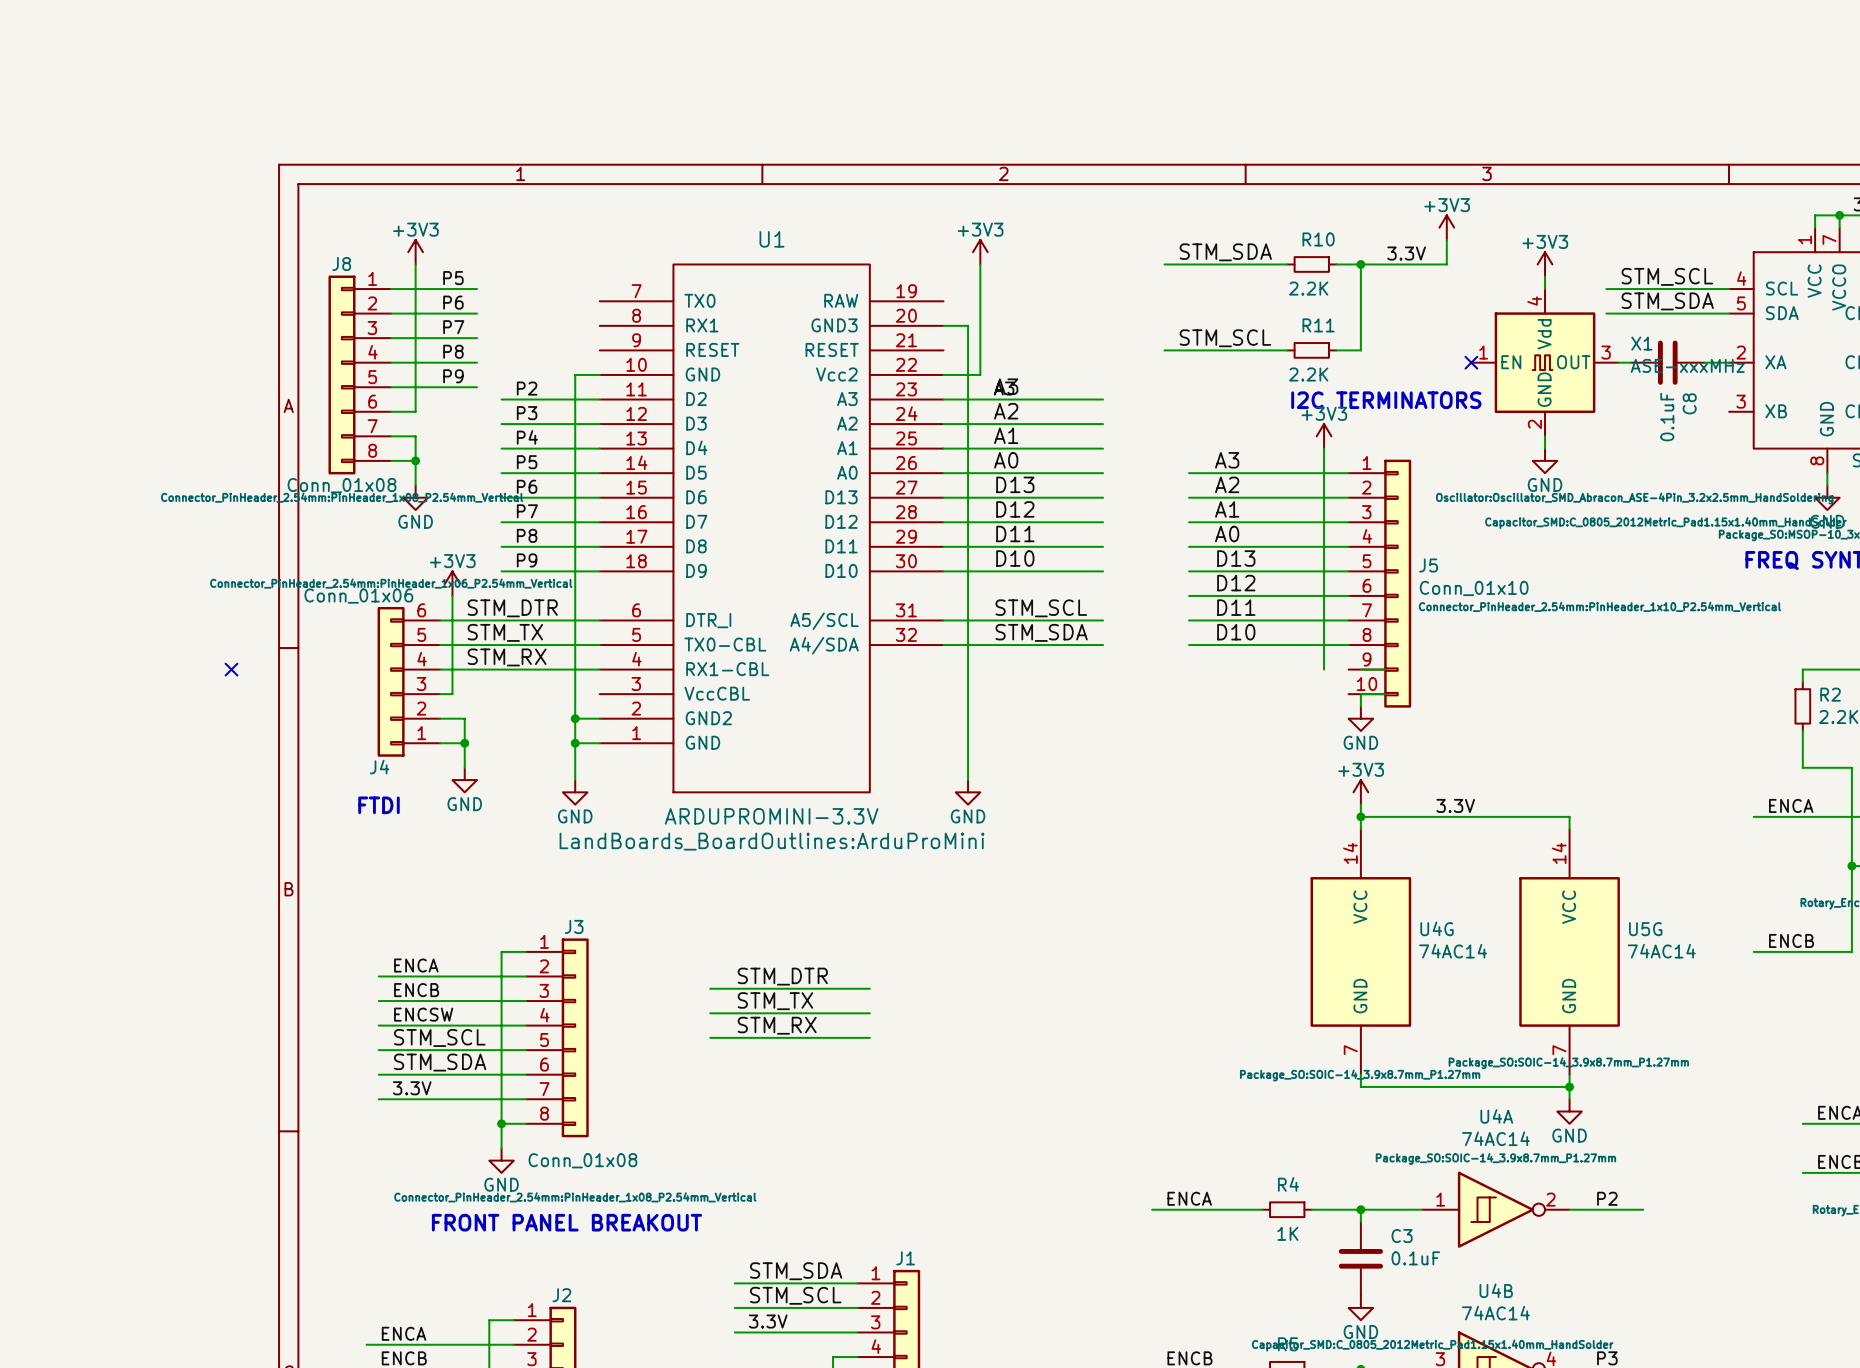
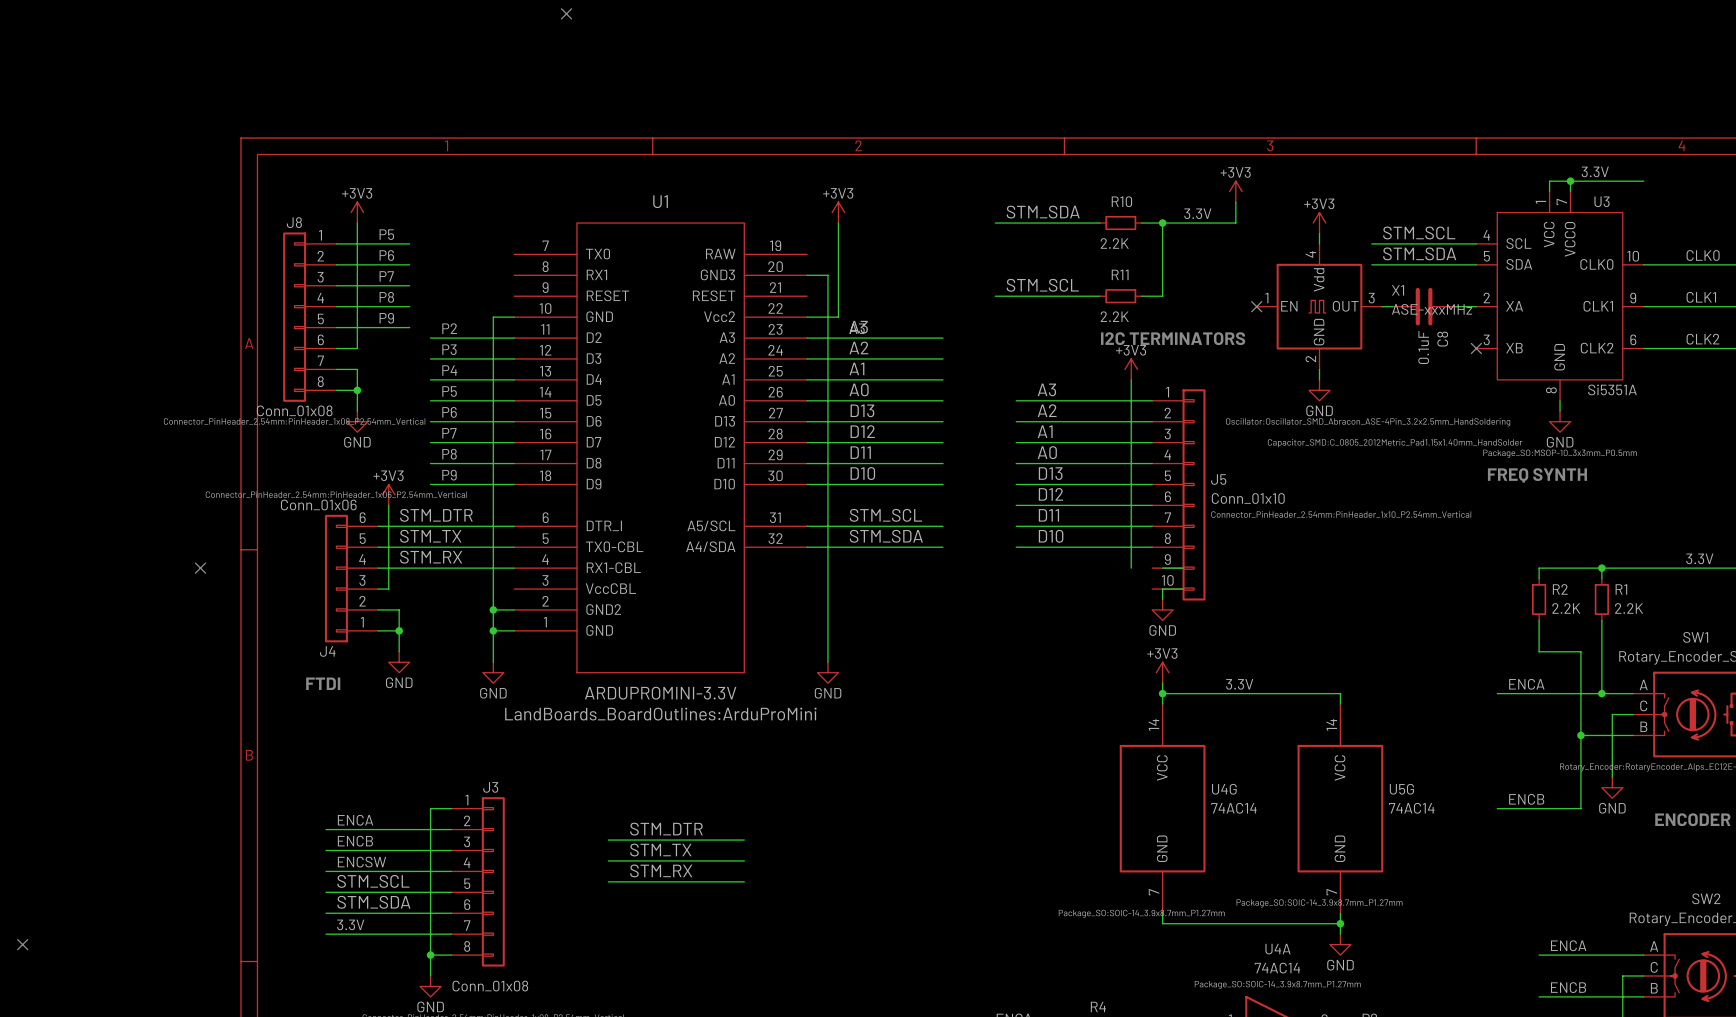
no-connect mark: none -> (566, 13)
no-connect mark: none -> (1476, 348)
no-connect mark: none -> (22, 944)

